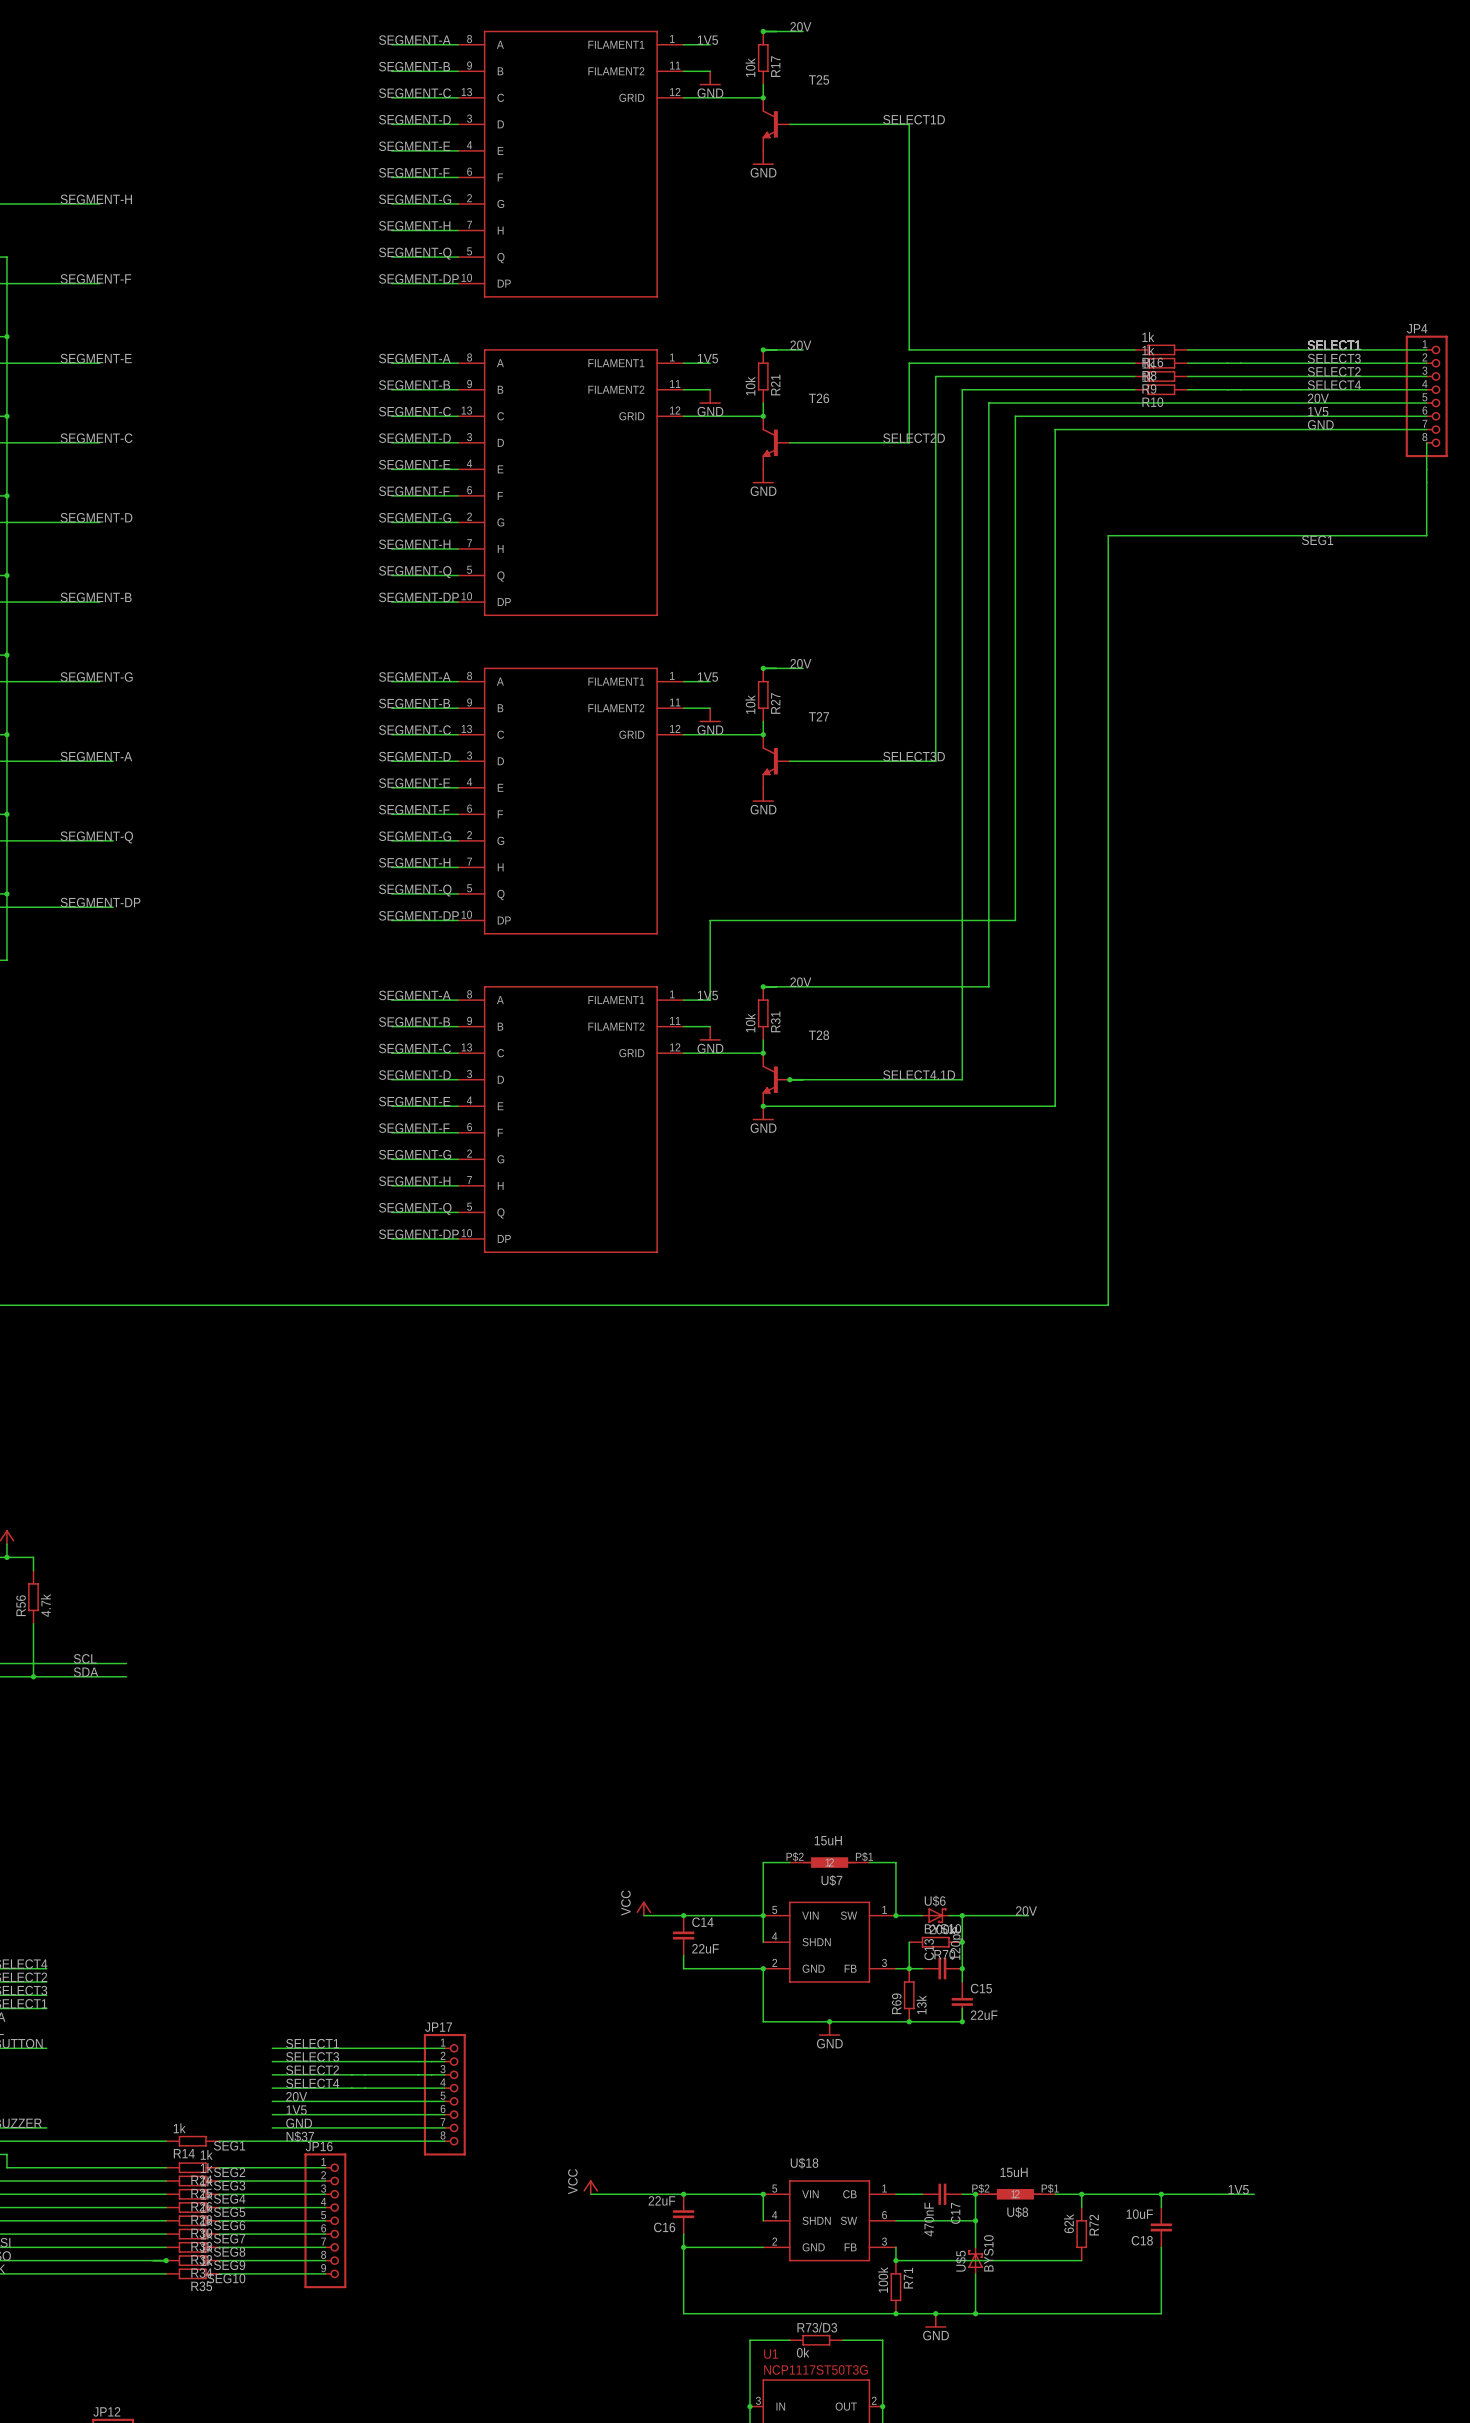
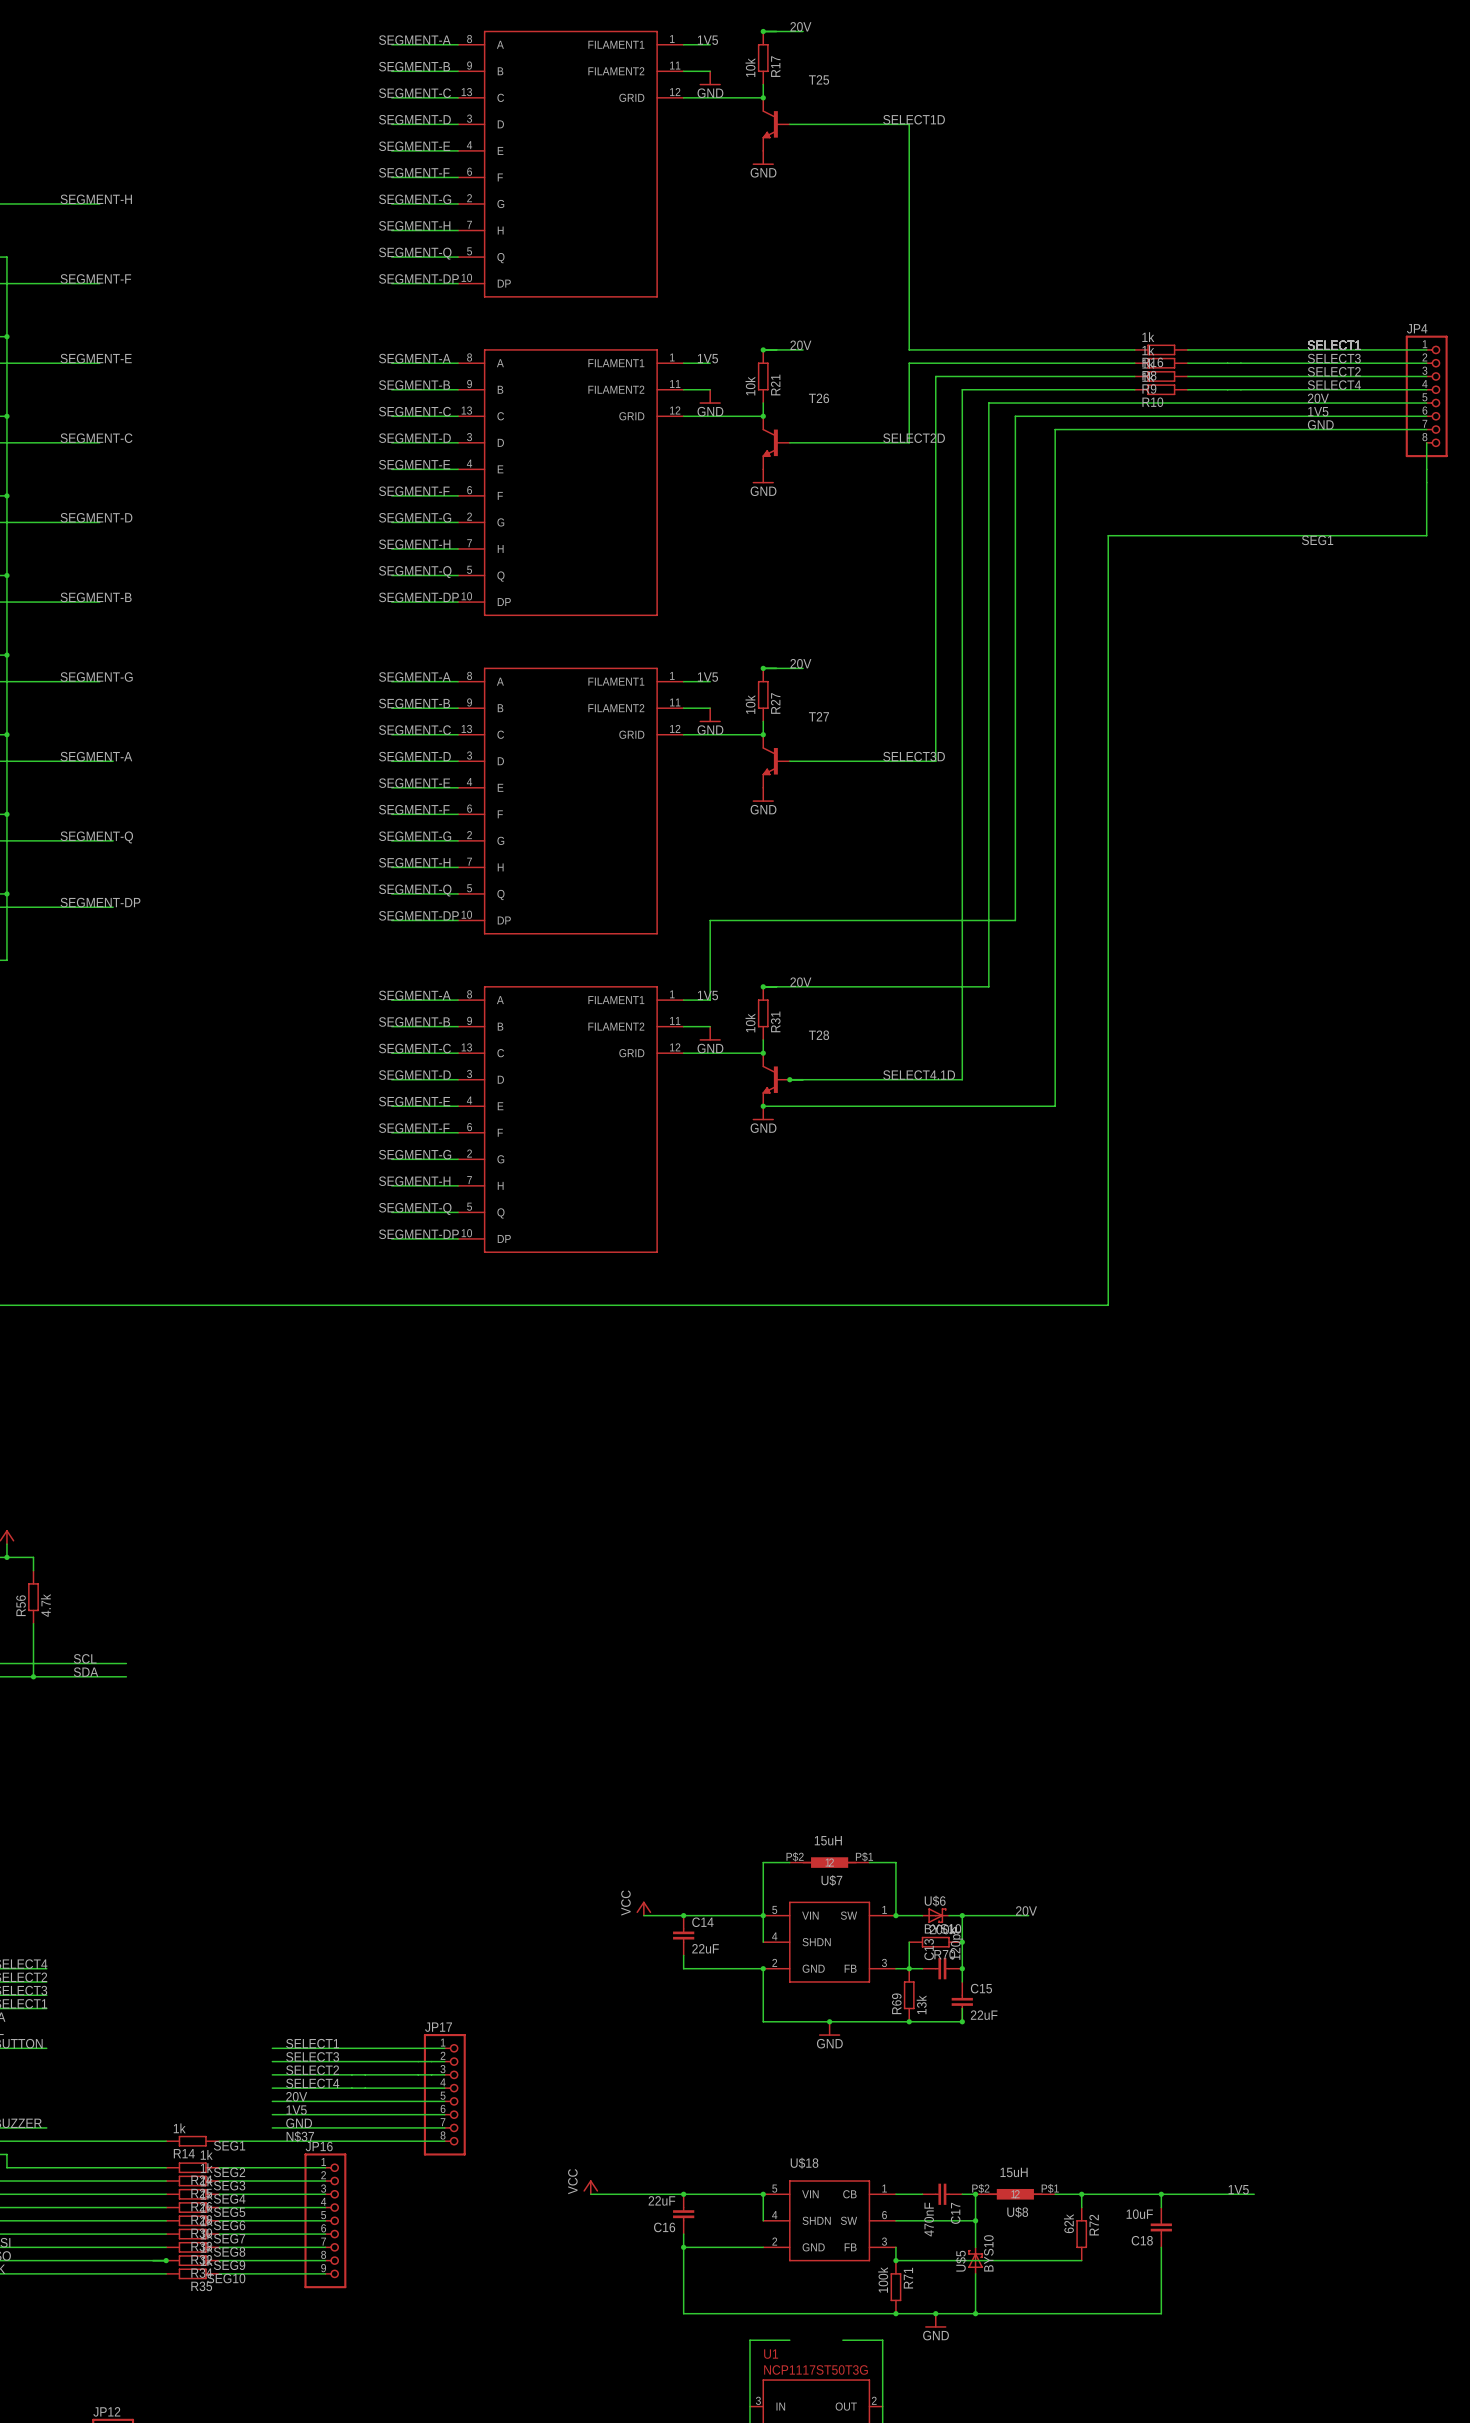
R73/D3: 0k (816, 2340) -> none
junction: (750, 2406) -> none
junction: (882, 2406) -> none

